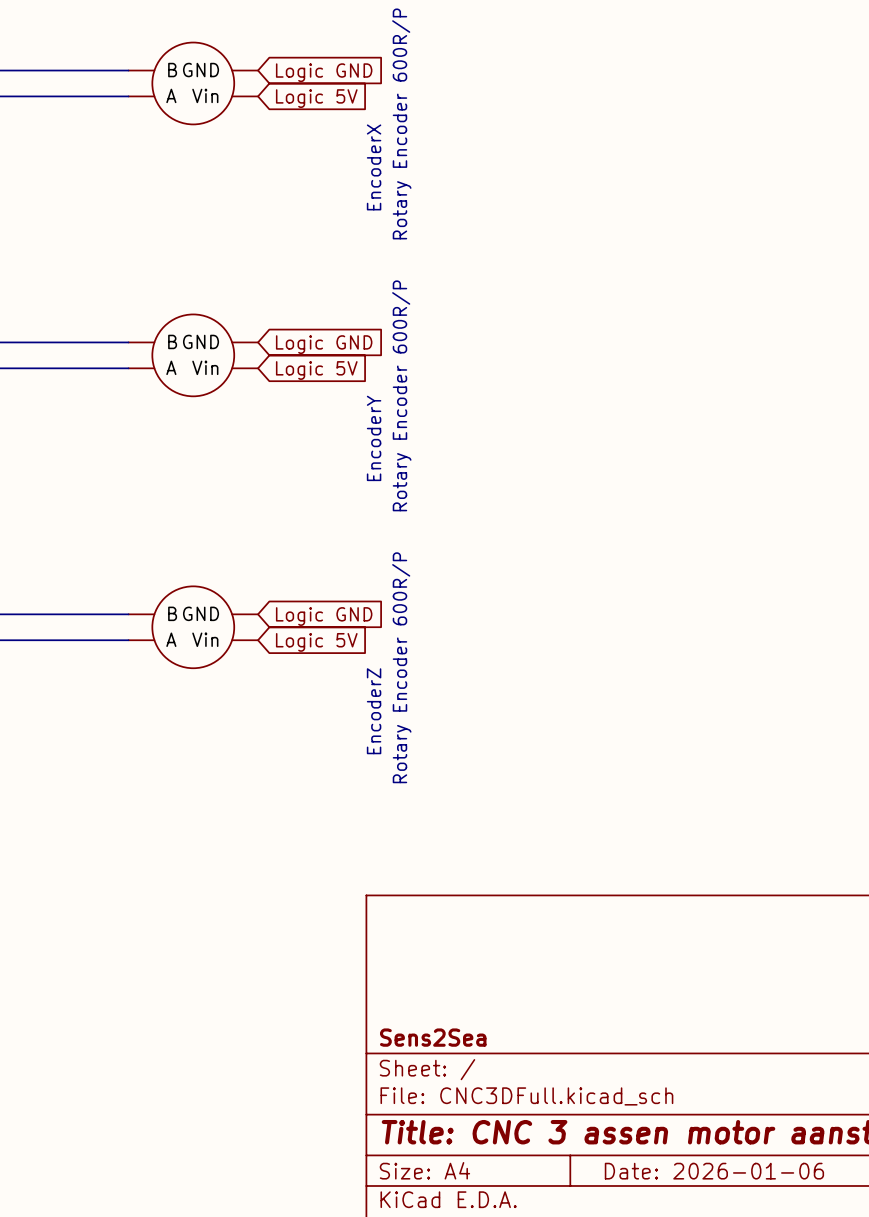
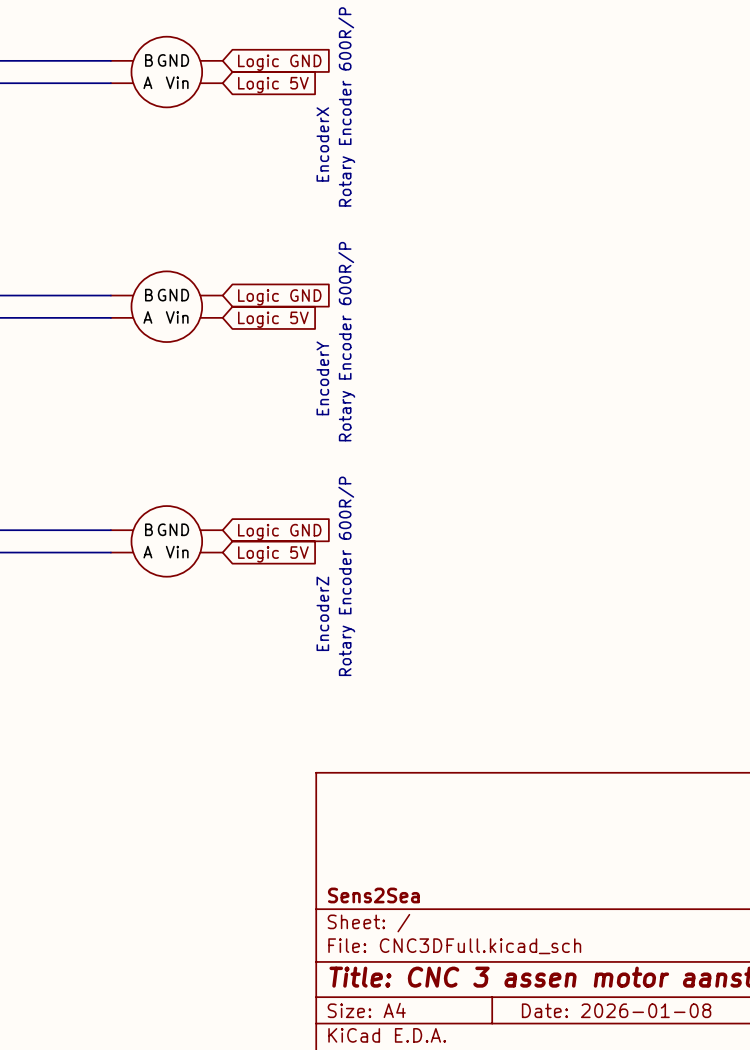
title block: Date: 2026-01-06 (714, 1171) -> Date: 2026-01-08 (616, 1010)

